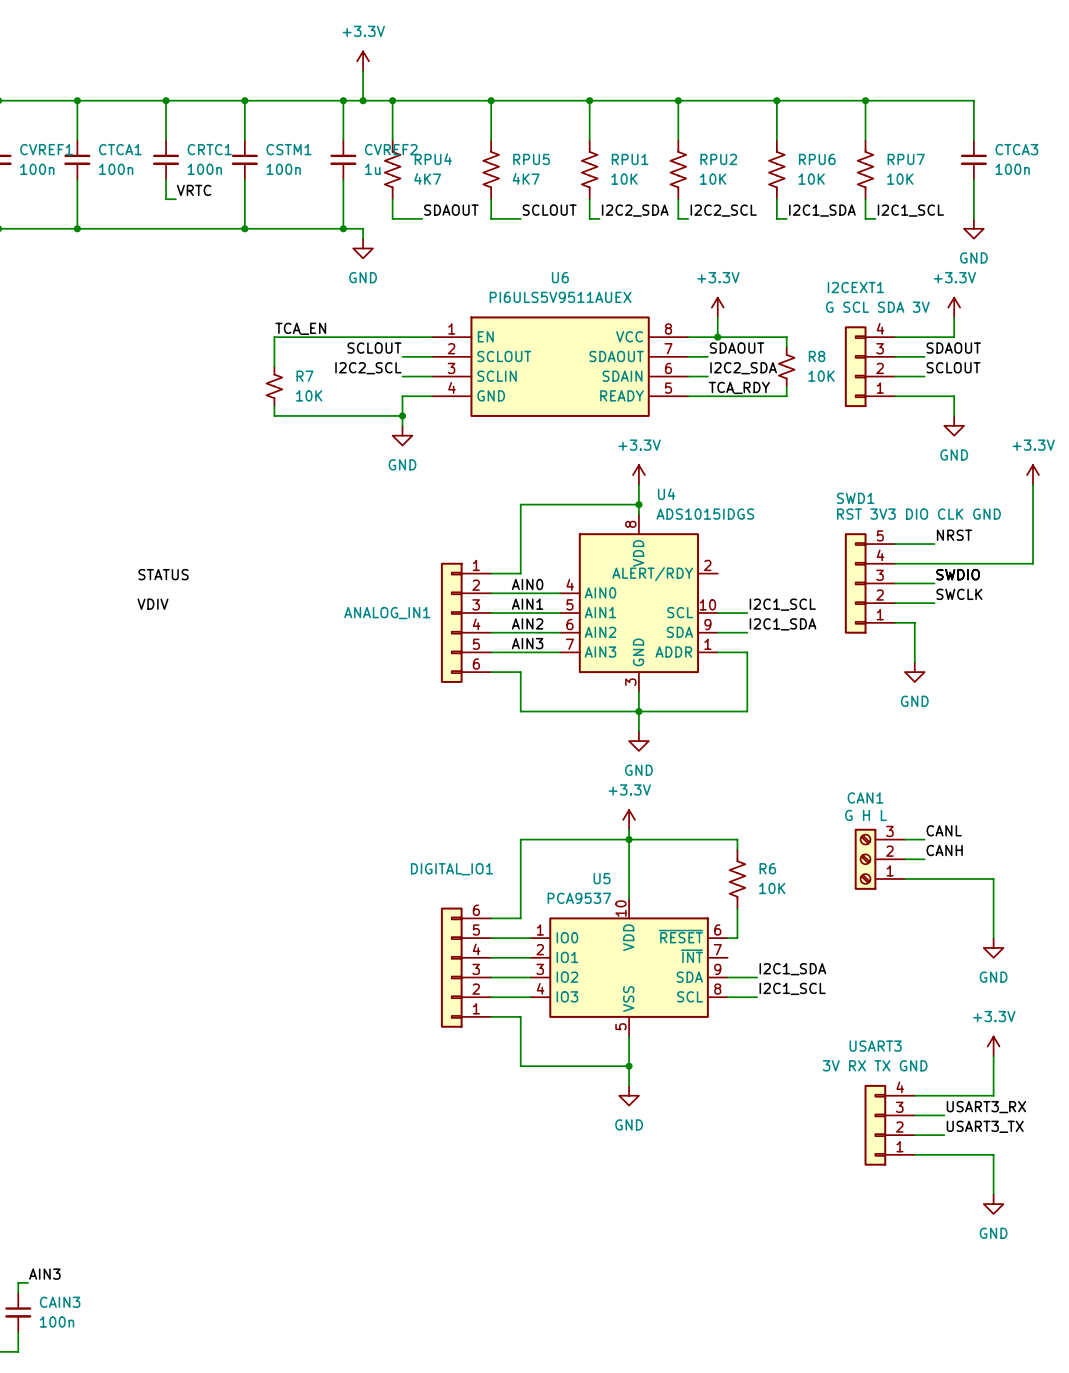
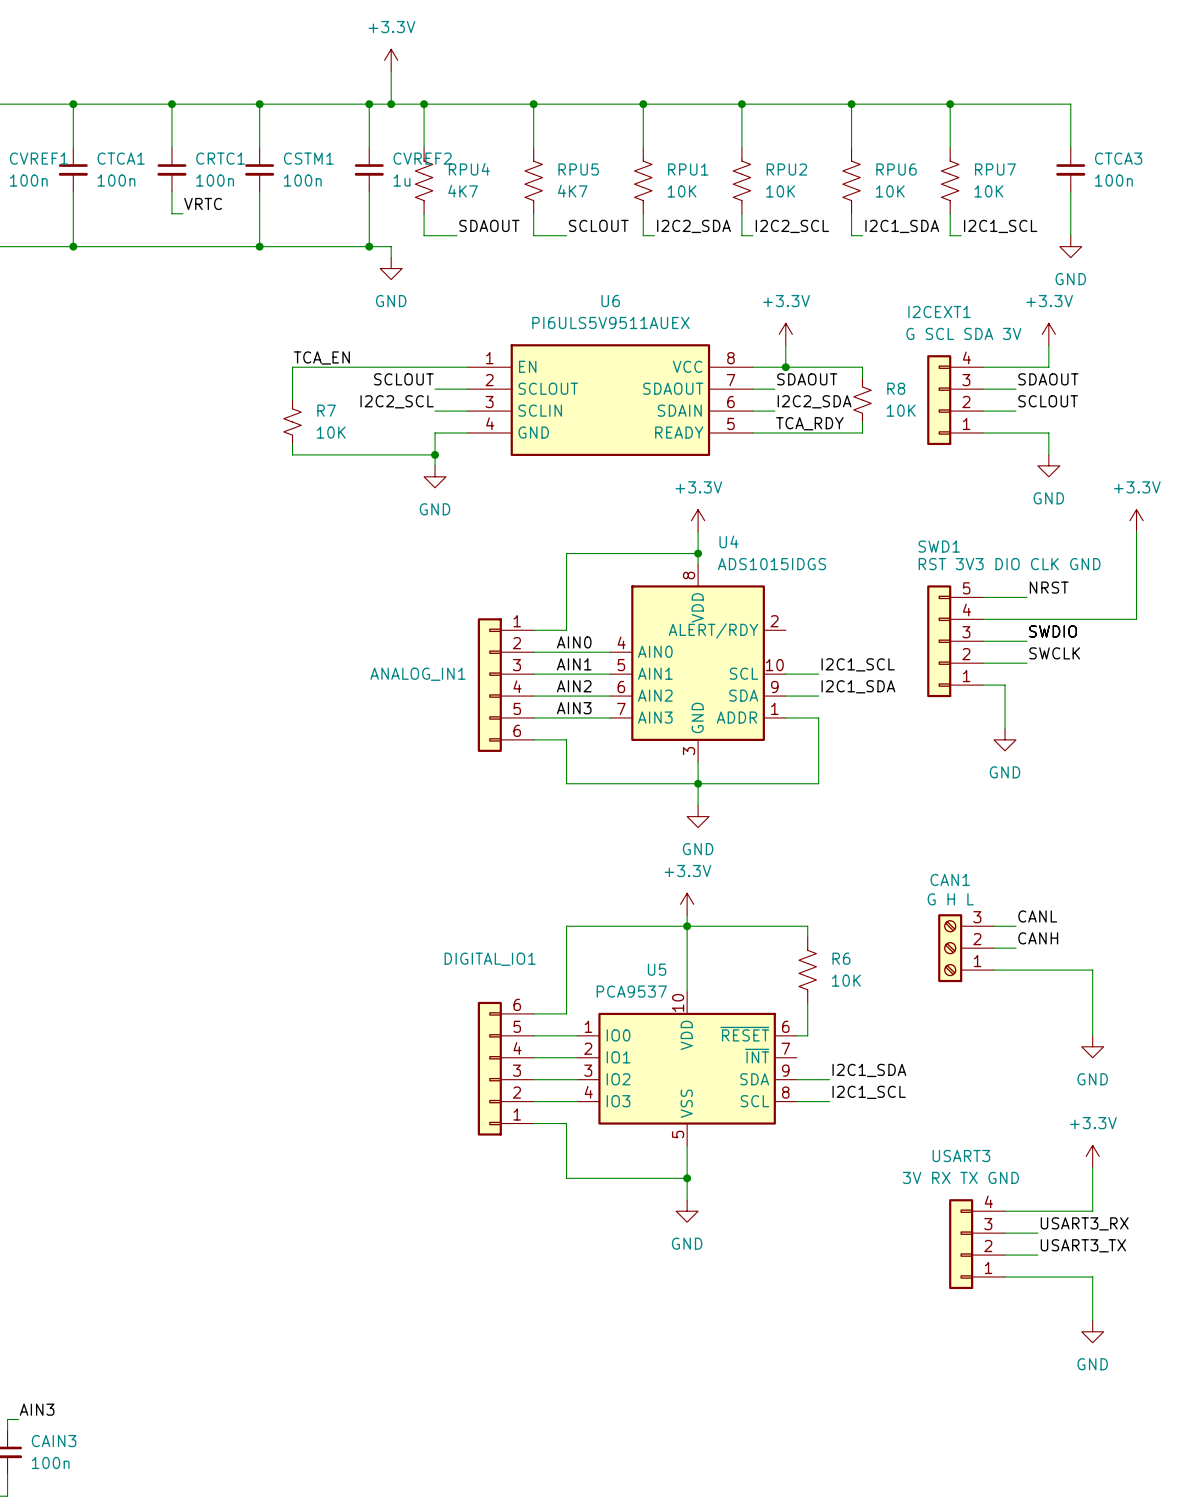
label: STATUS (163, 574) -> none
label: VDIV (152, 604) -> none

